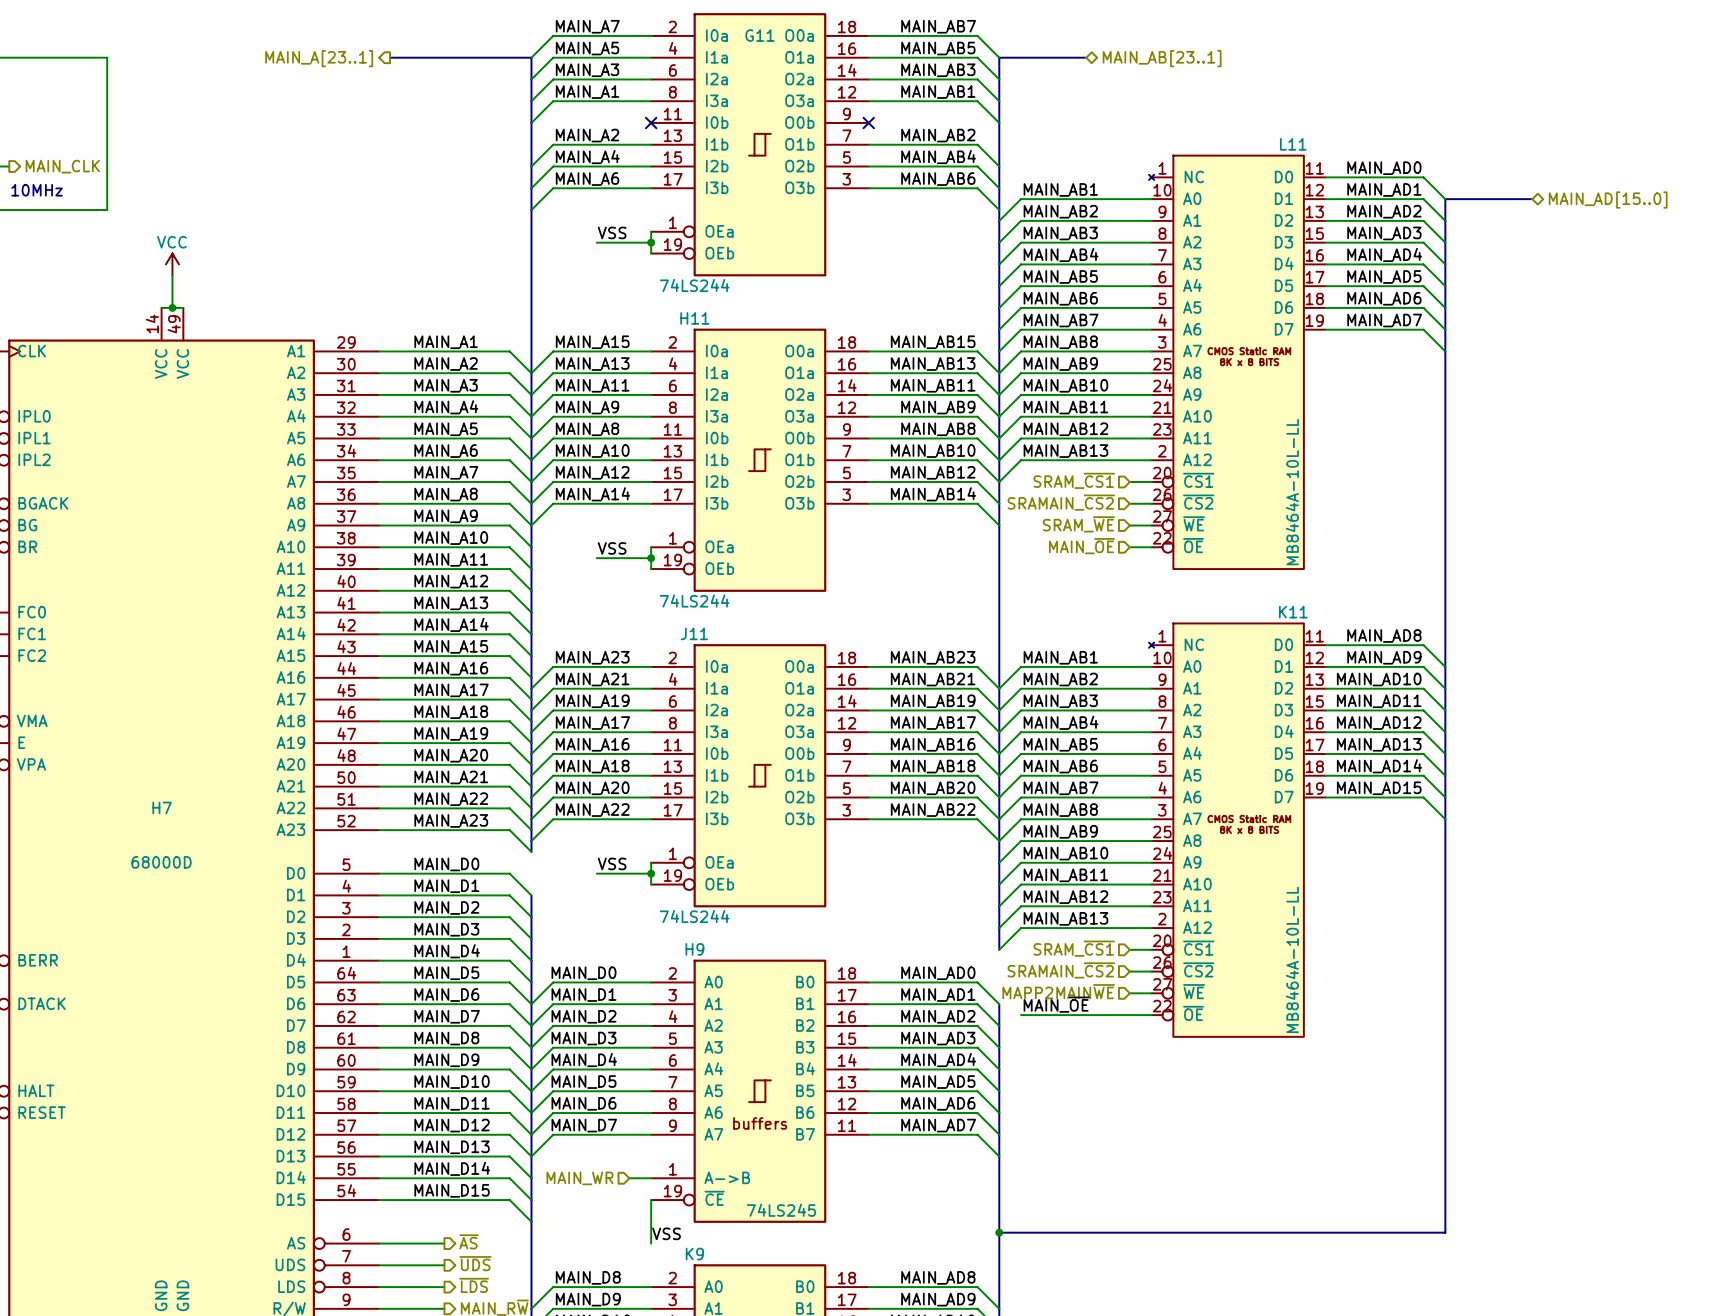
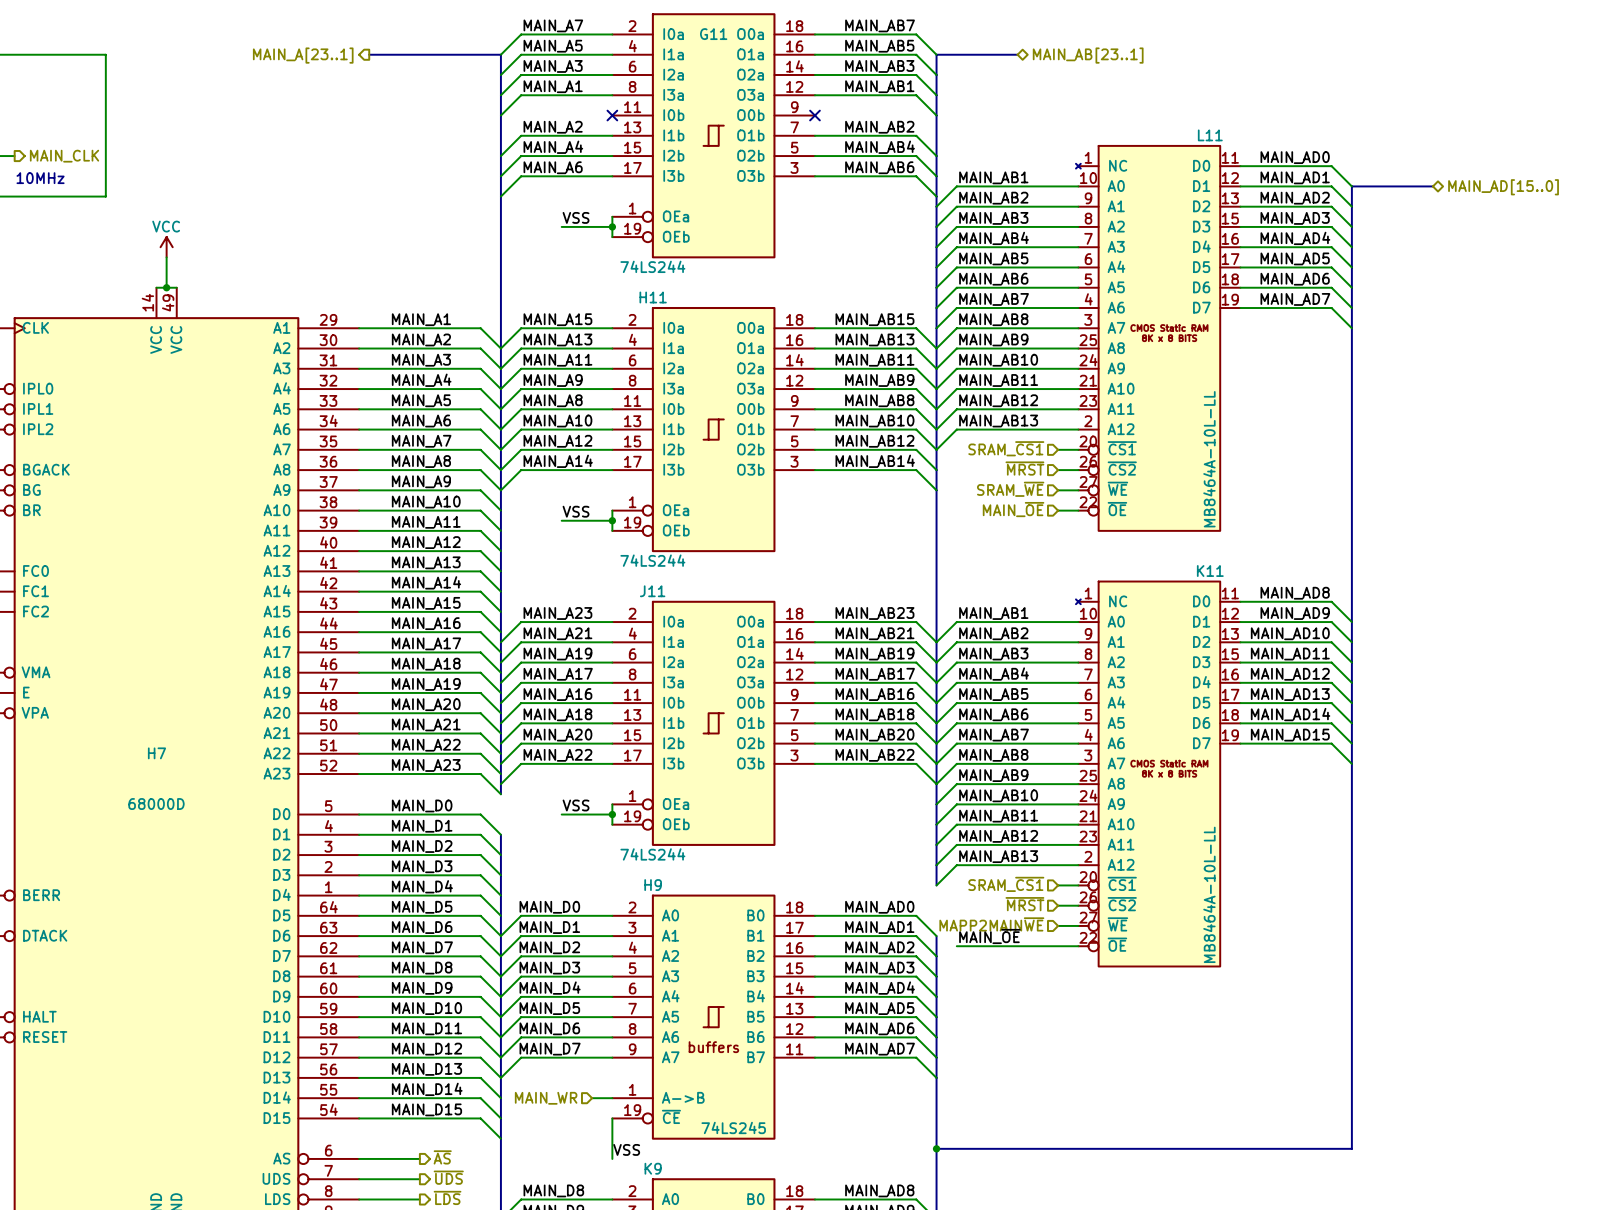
hierarchical label: SRAMAIN_~{CS2} (1061, 502) -> ~{MRST} (1024, 468)
hierarchical label: SRAMAIN_~{CS2} (1061, 970) -> ~{MRST} (1024, 904)

